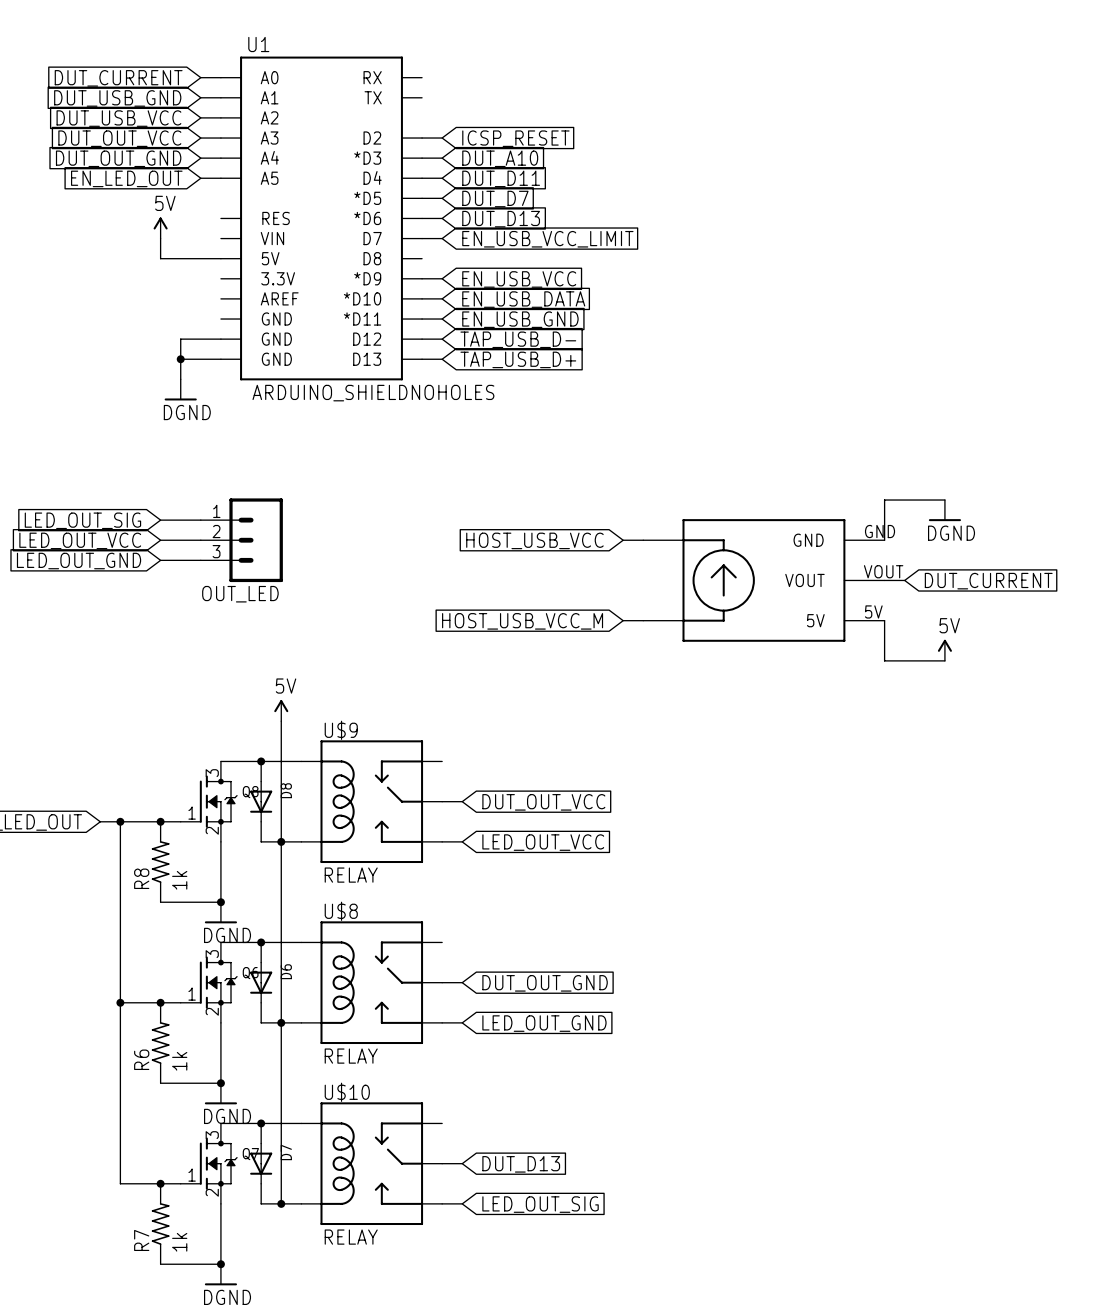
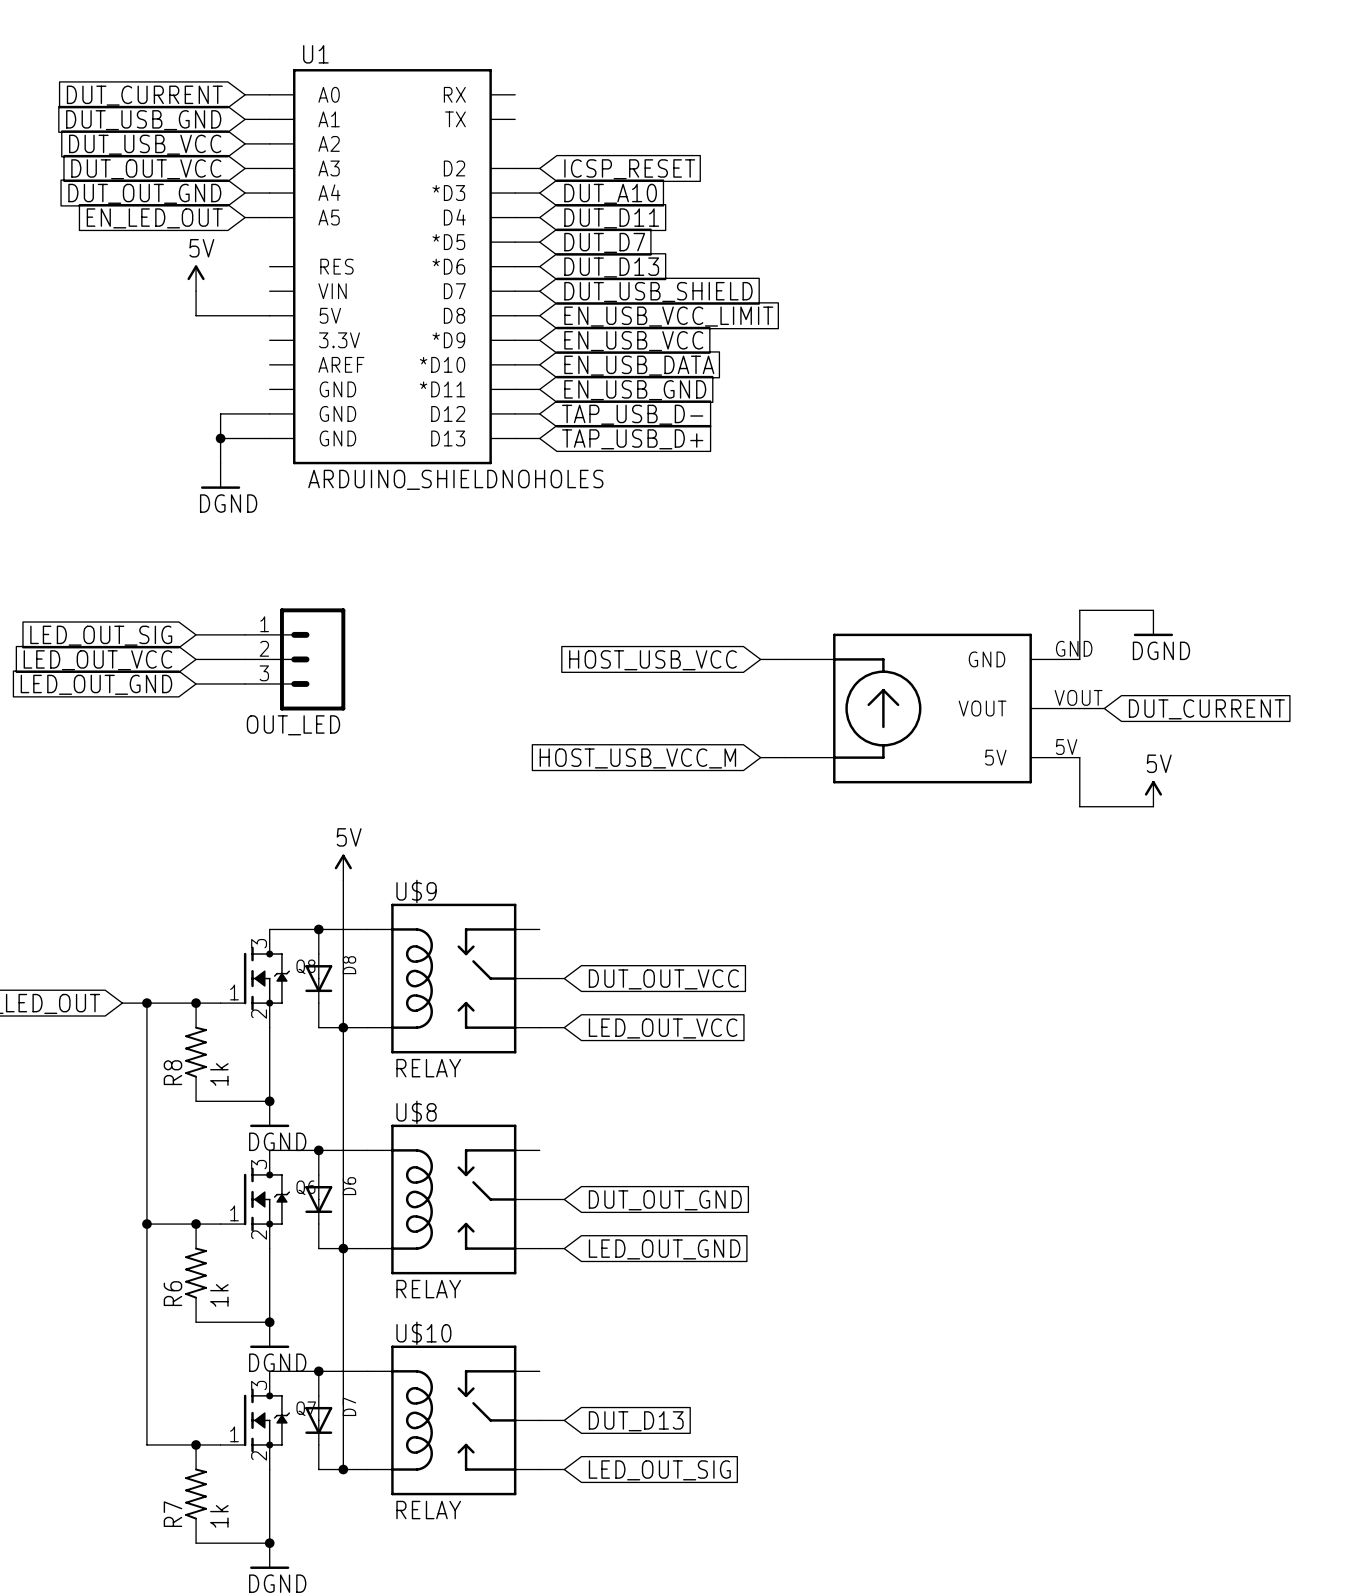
global label: EN_USB_VCC_LIMIT (547, 239) -> DUT_USB_SHIELD (658, 292)
wire: none -> (515, 315) (539, 315)
global label: none -> EN_USB_VCC_LIMIT (668, 316)

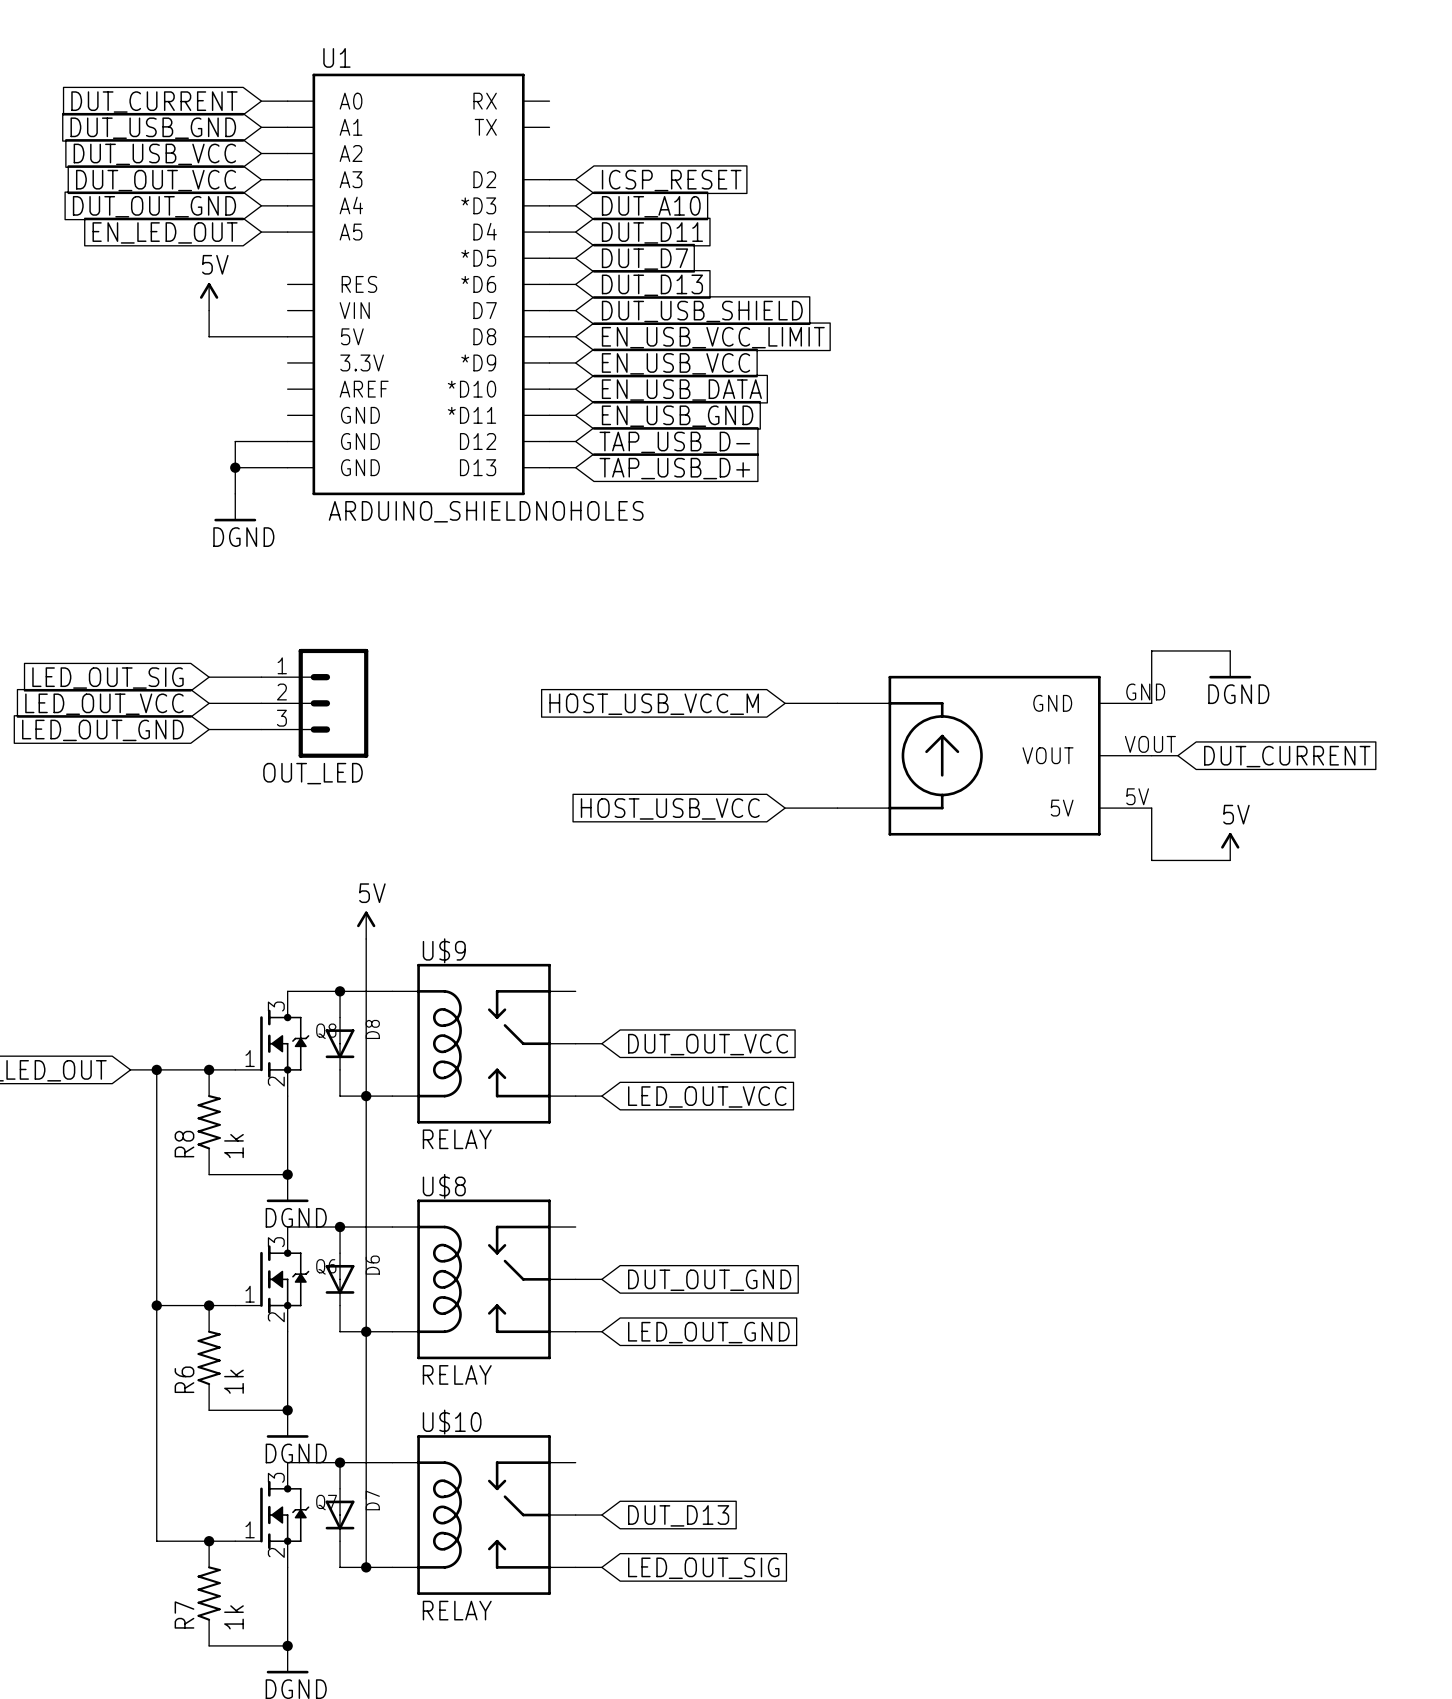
wire: none -> (785, 703) (811, 703)
global label position: HOST_USB_VCC (652, 660) -> HOST_USB_VCC (670, 808)
wire: none -> (785, 808) (811, 808)
global label position: HOST_USB_VCC_M (637, 758) -> HOST_USB_VCC_M (654, 704)

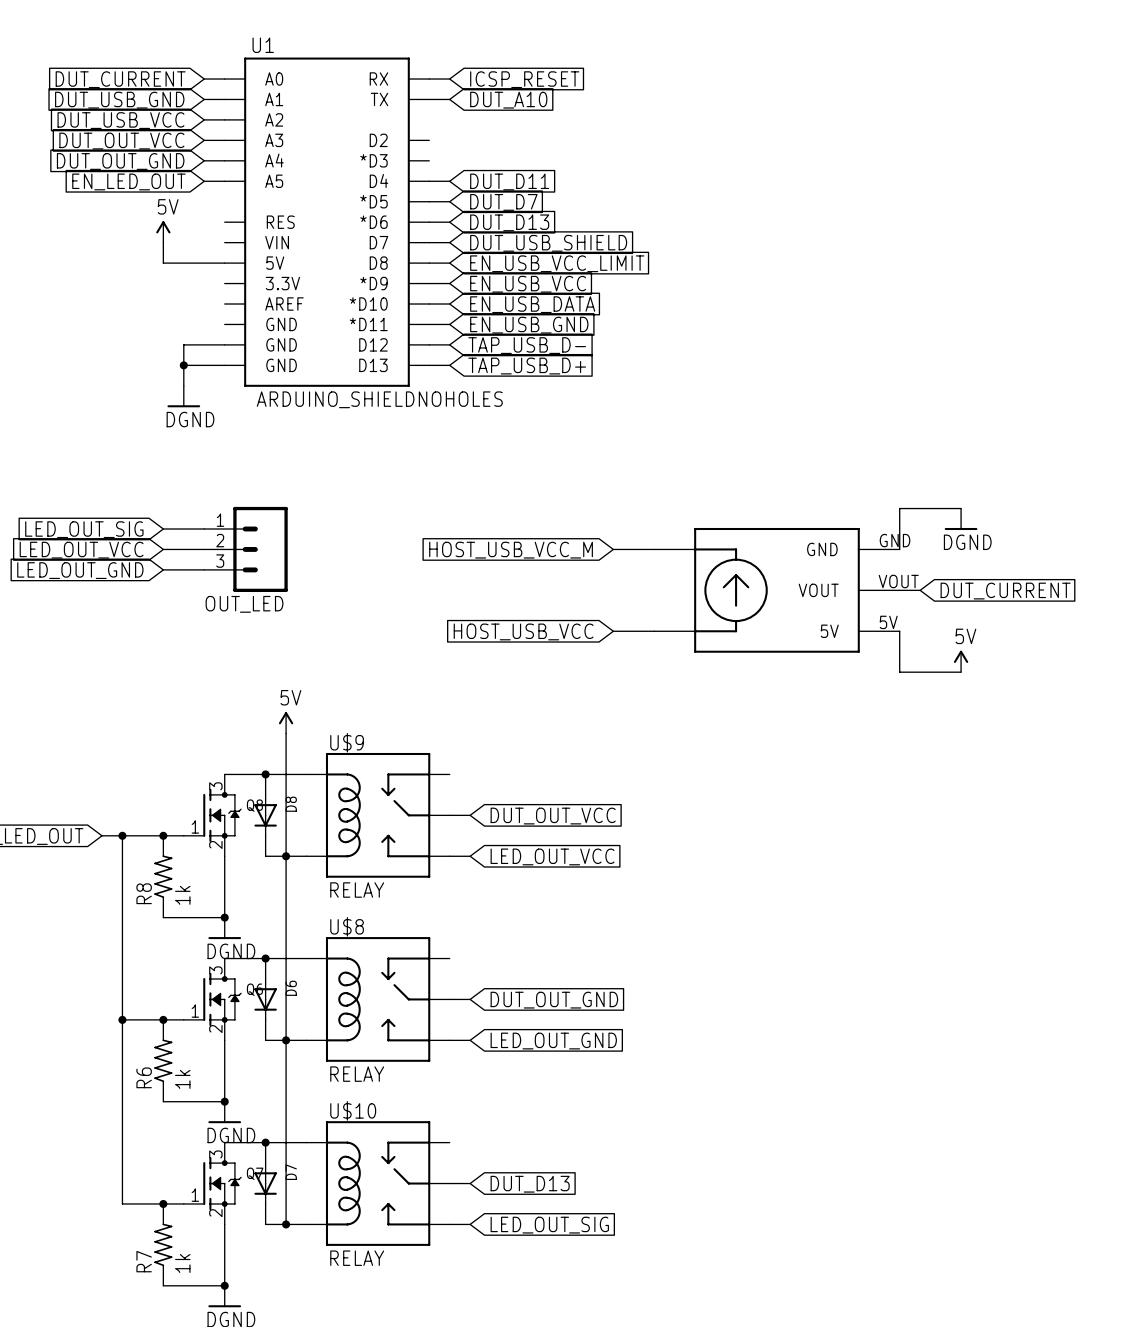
wire: (549, 179) (575, 179) -> (429, 99) (449, 99)
global label position: ICSP_RESET (671, 180) -> ICSP_RESET (524, 79)
wire: (549, 205) (575, 205) -> (429, 79) (449, 79)
global label position: DUT_A10 (651, 206) -> DUT_A10 (508, 100)

